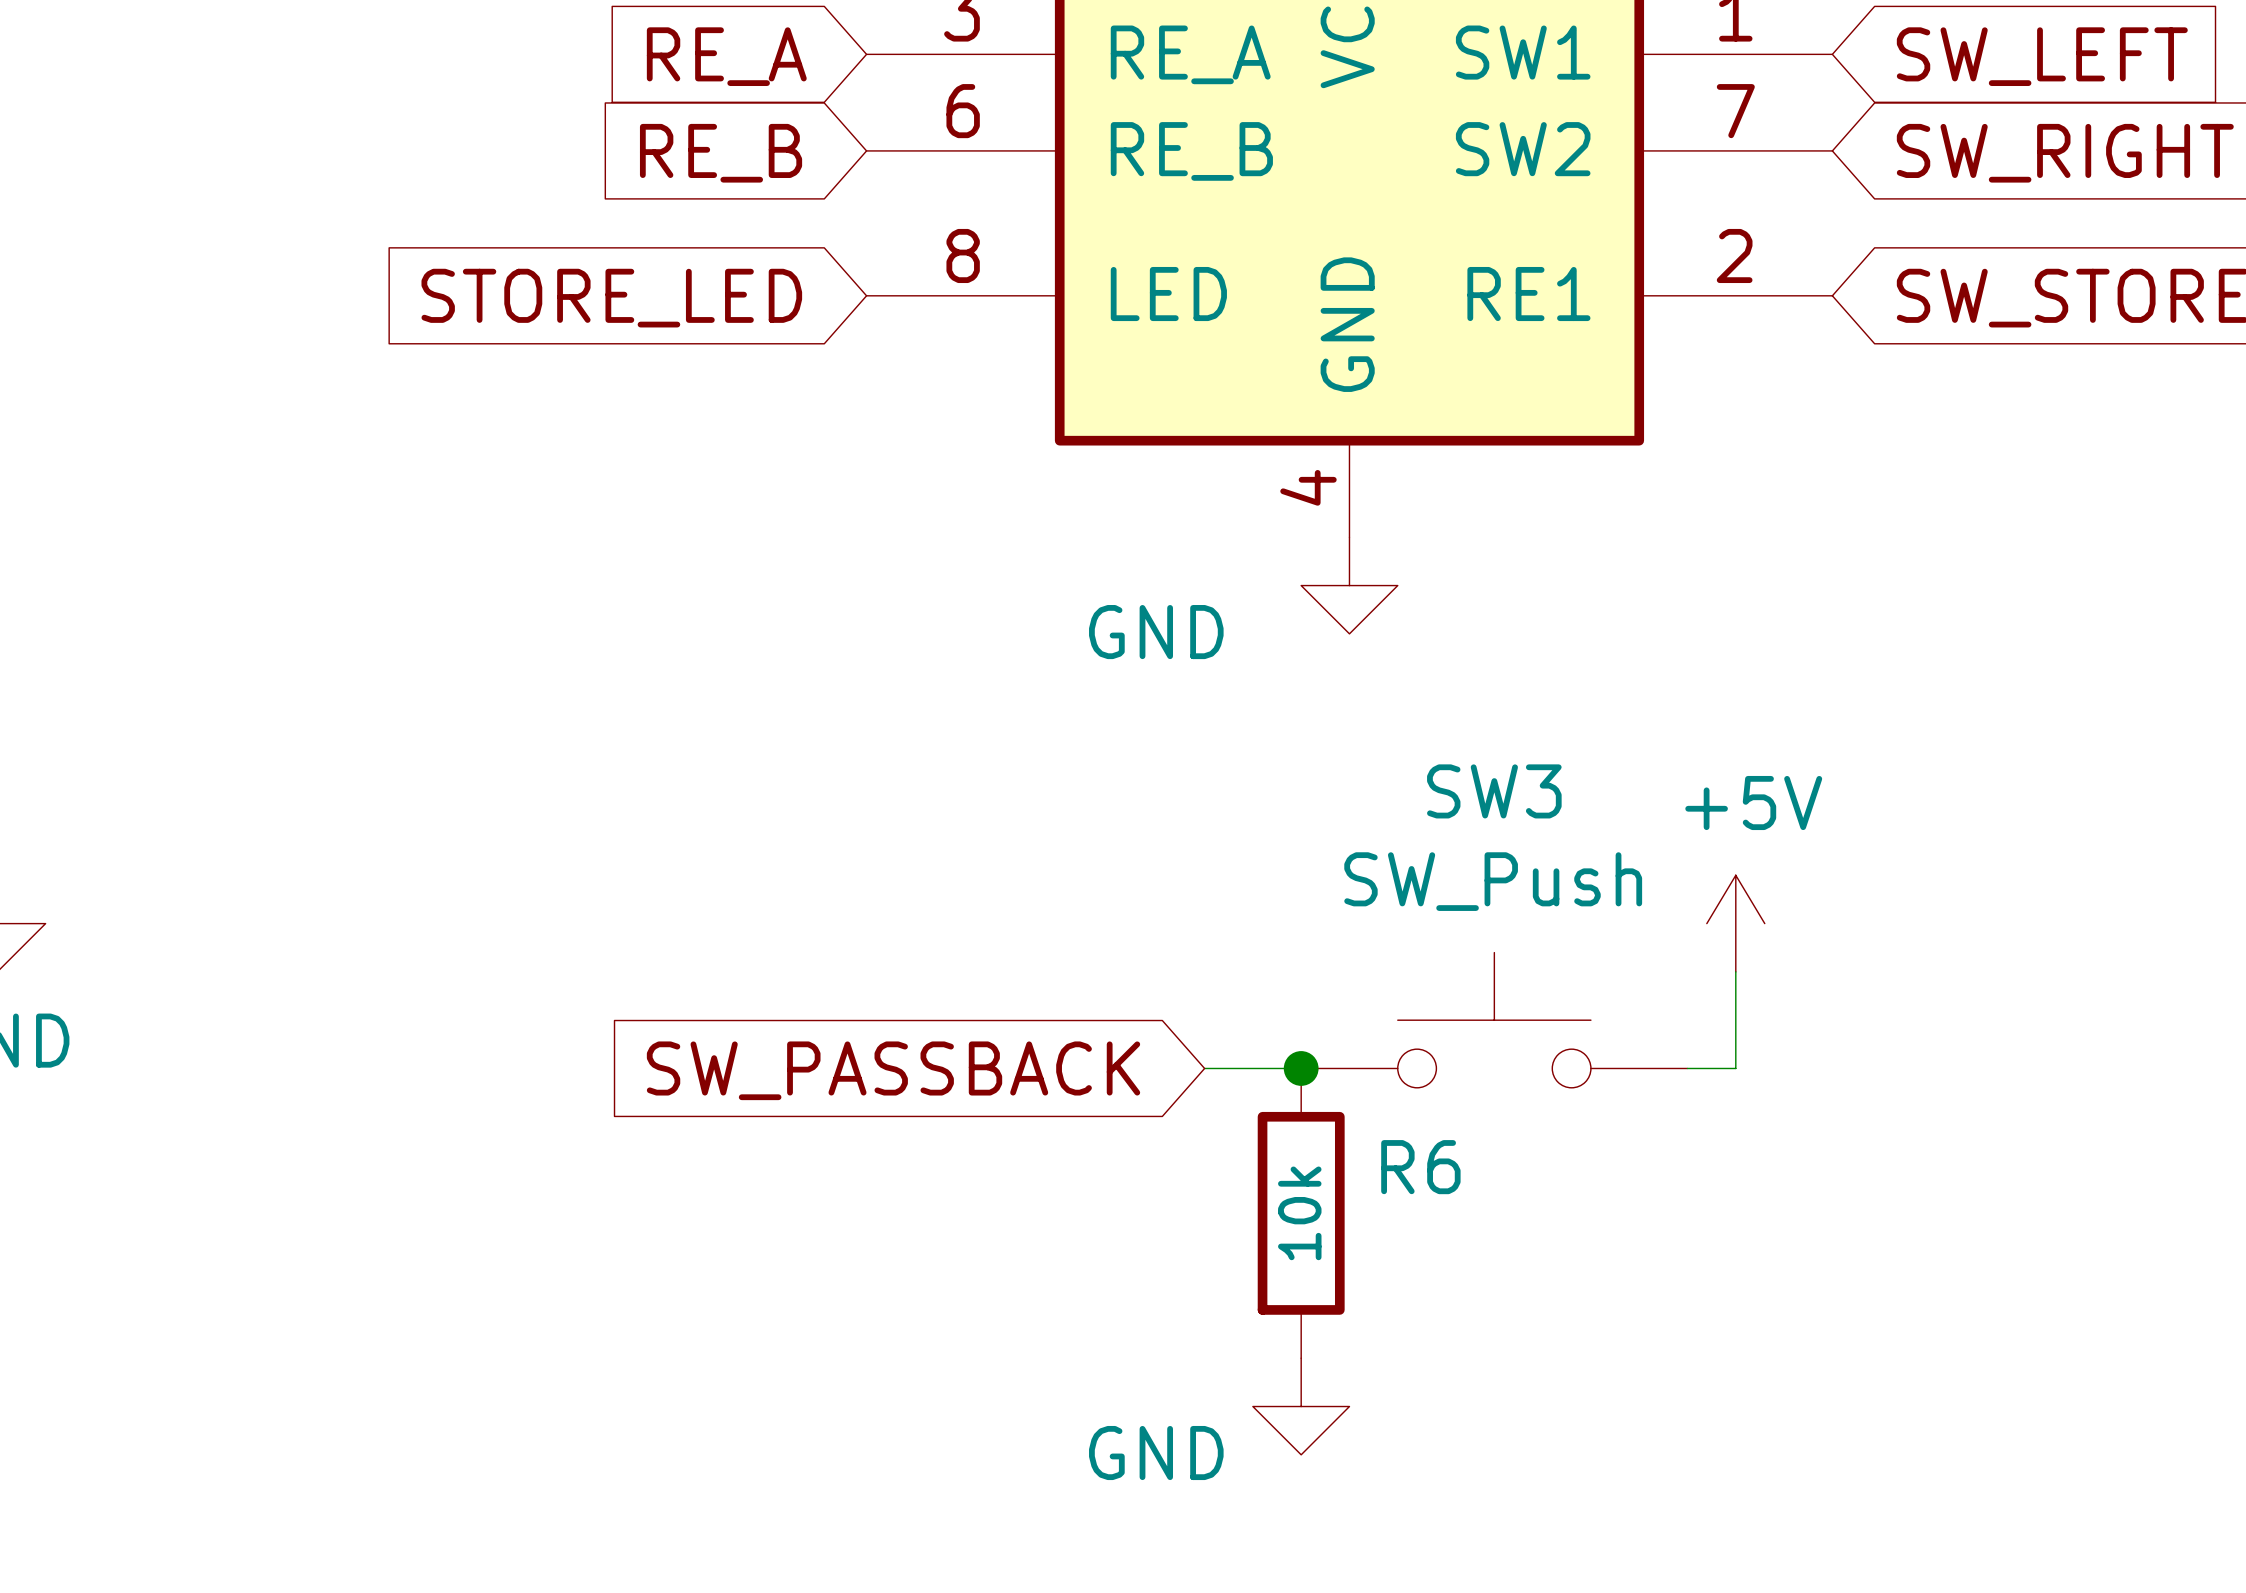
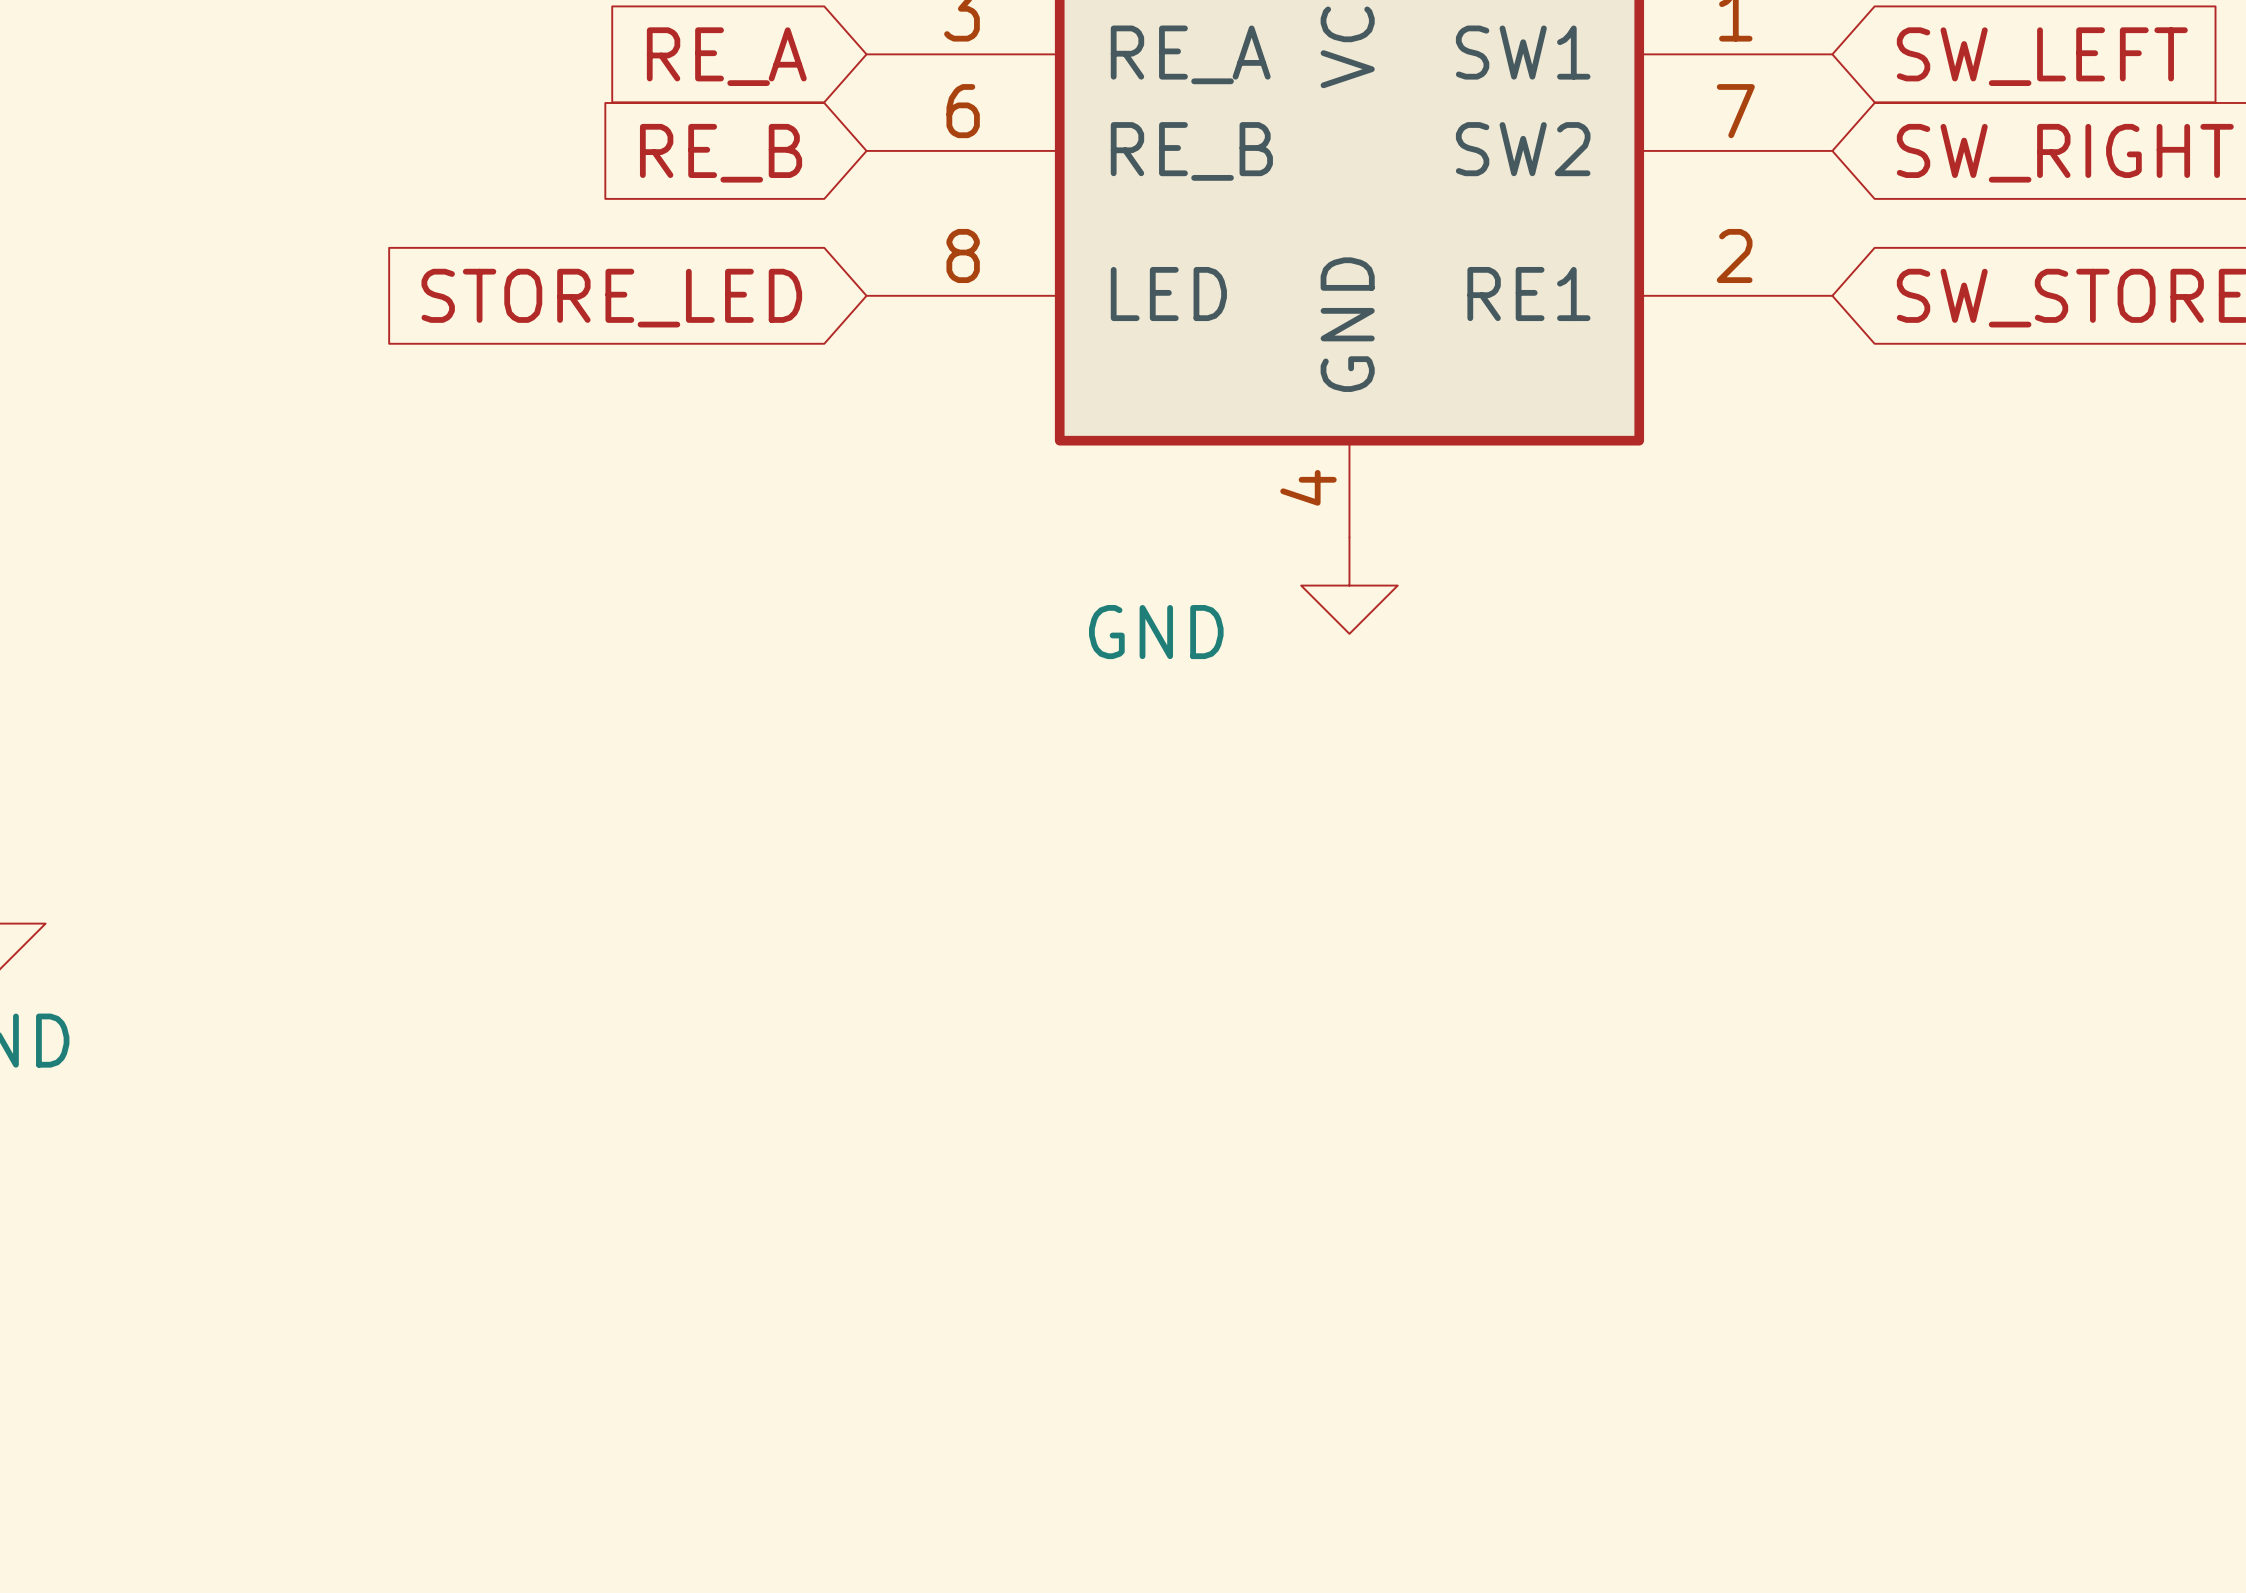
power symbol: +5V (1735, 923) -> none
wire: (1735, 971) (1735, 1068) (1687, 1068) -> none
SW3: SW_Push (1494, 1020) -> none
wire: (1204, 1068) (1301, 1068) -> none
junction: (1301, 1068) -> none
global label: SW_PASSBACK (893, 1070) -> none
R6: 10k (1301, 1213) -> none
power symbol: GND (1301, 1406) -> none

